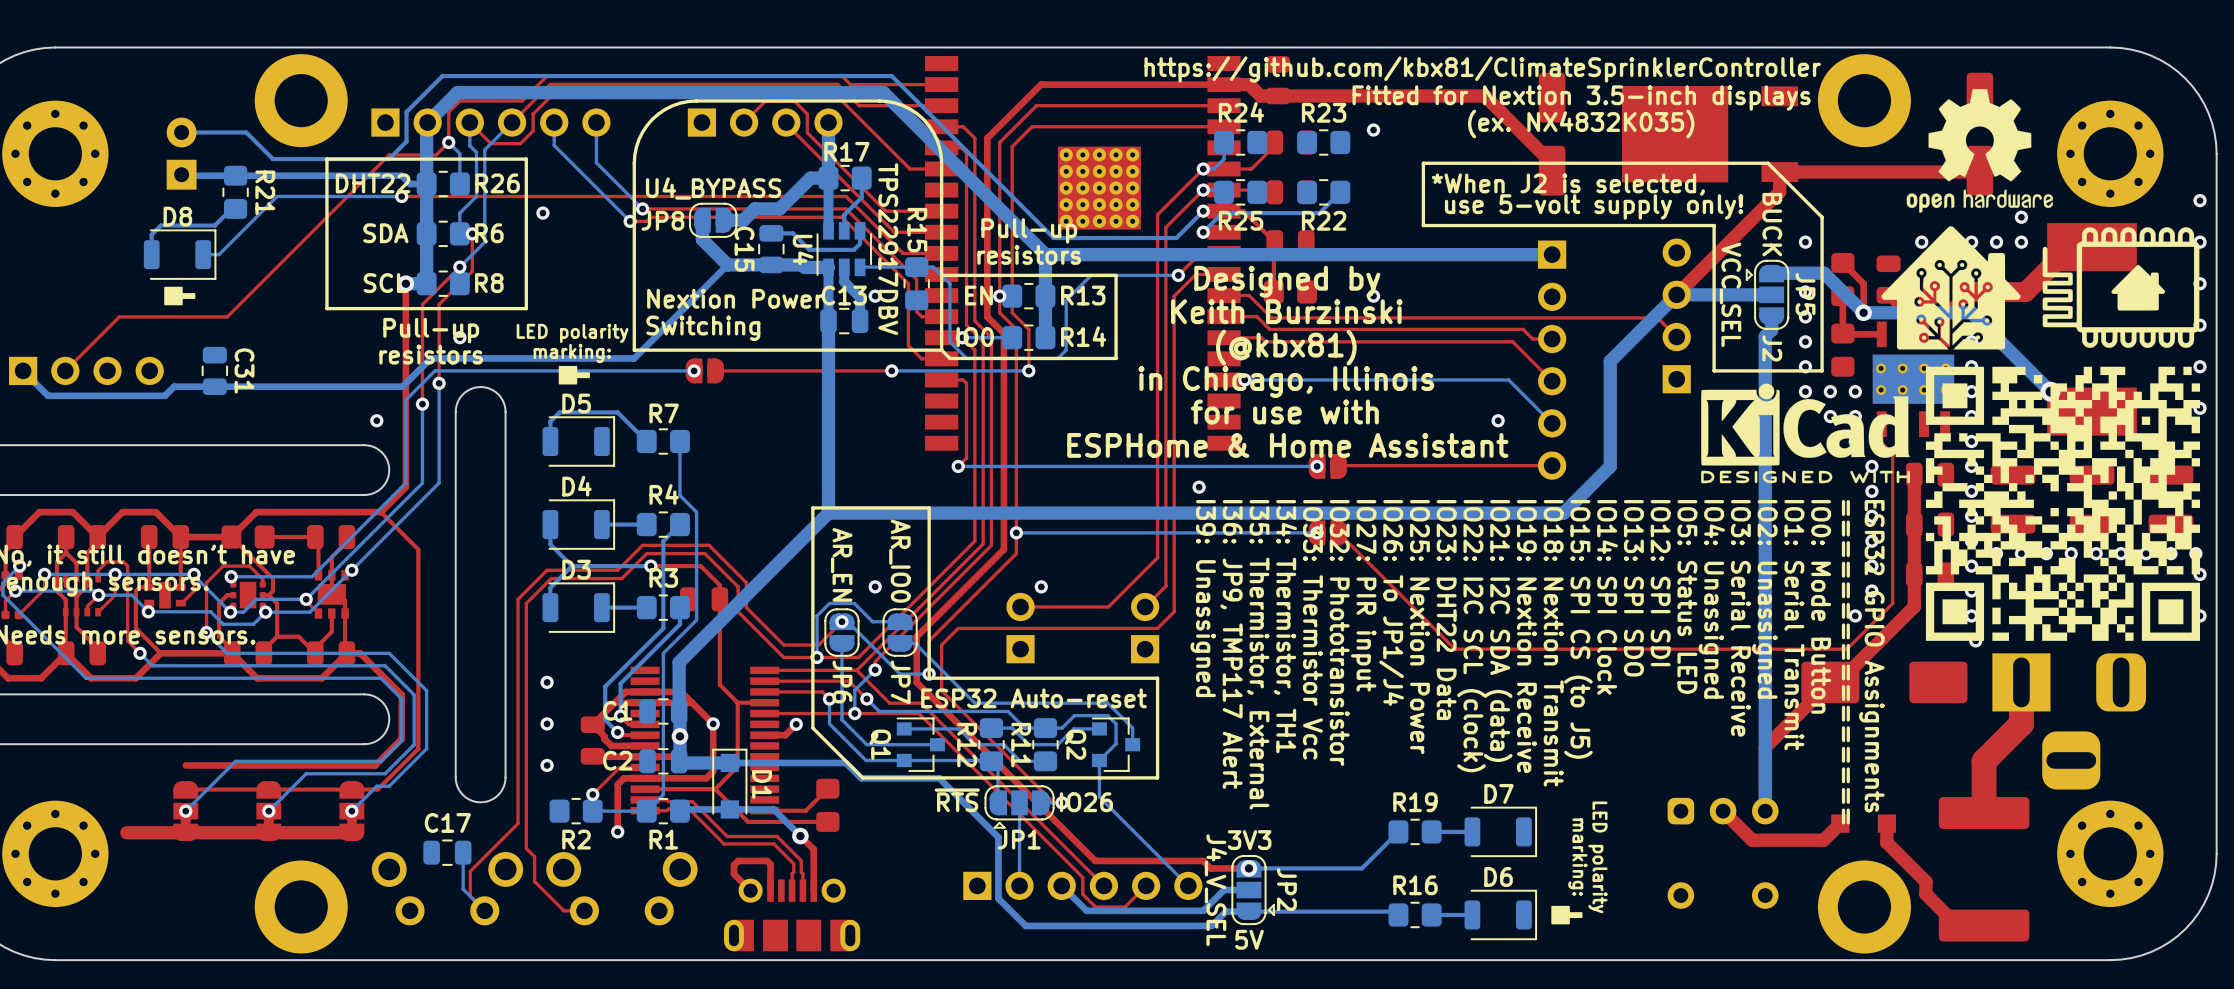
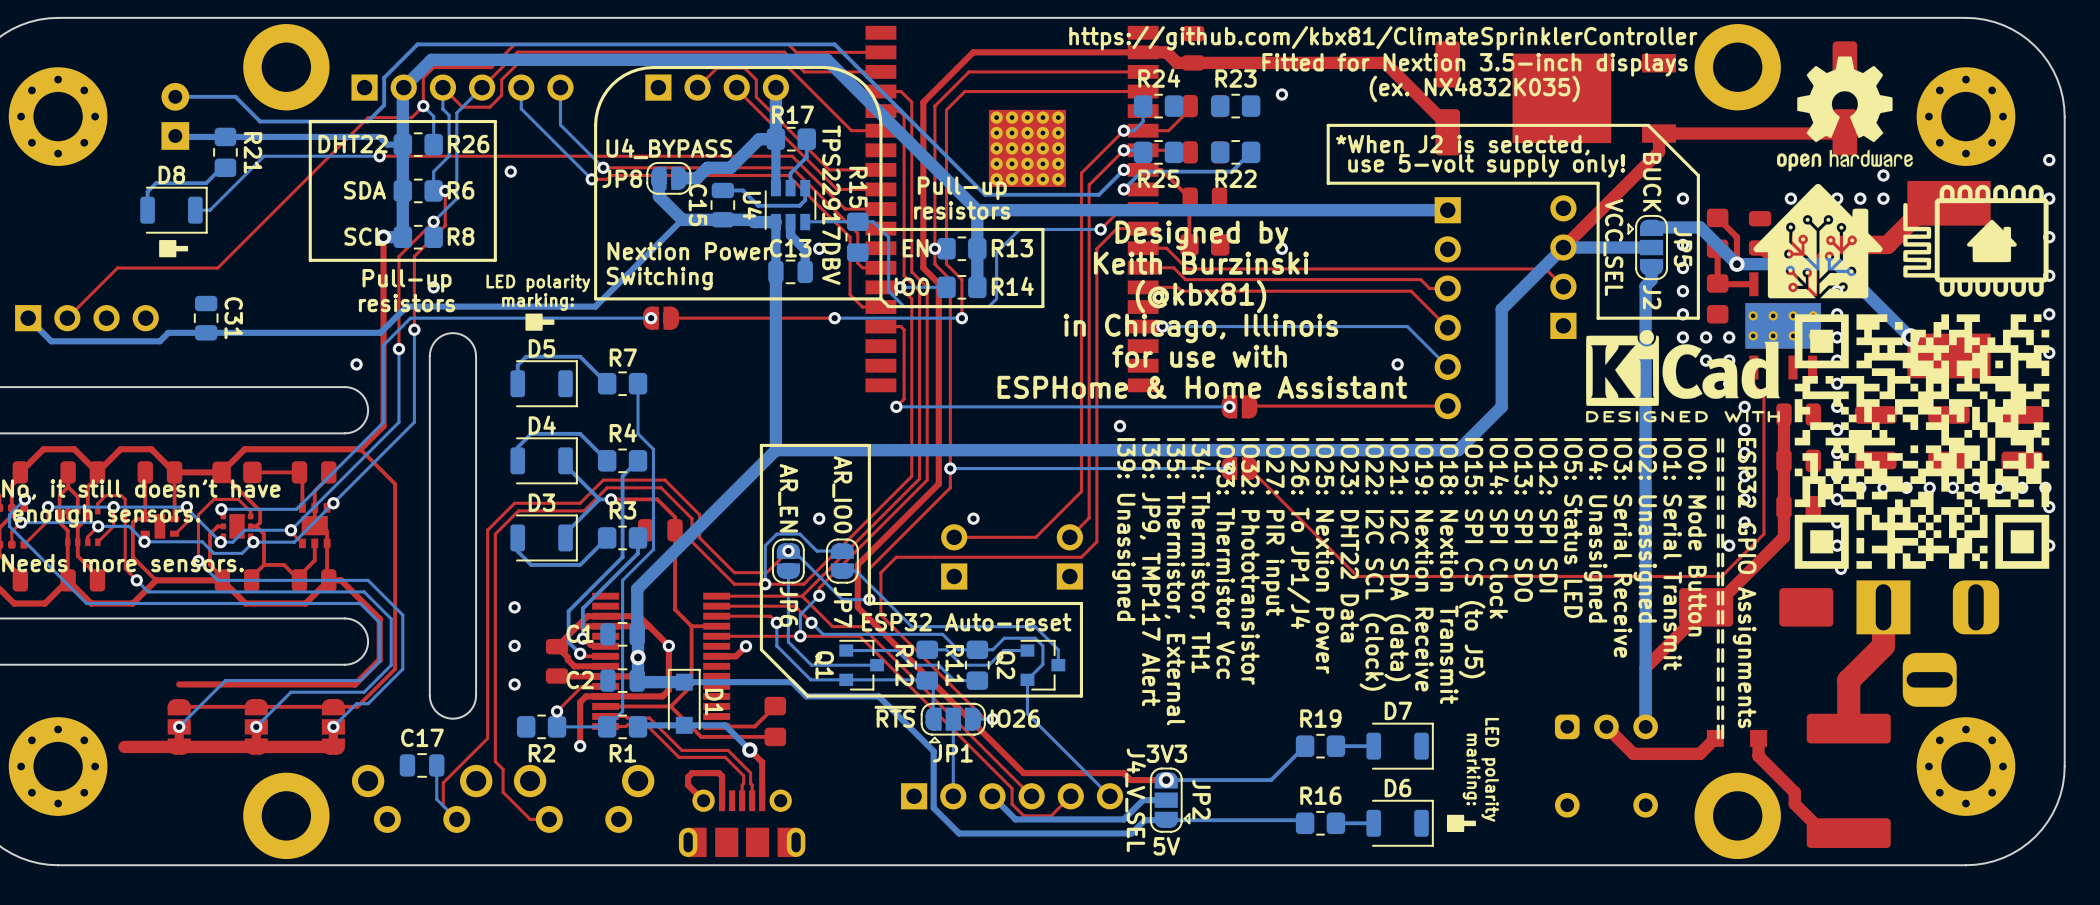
bottom track: (550, 524) (550, 544) (572, 566) -> none
bottom track: none -> (565, 460) (565, 465) (599, 499) (565, 533) (565, 537)
bottom track: (646, 524) (601, 524) -> (607, 460) (580, 433) (531, 433) (517, 447) (517, 460)
bottom track: (572, 566) (550, 587) (550, 607) -> none
bottom track: (638, 566) (572, 566) -> none
bottom track: (646, 607) (601, 607) -> (607, 537) (580, 564) (531, 564) (517, 551) (517, 537)

